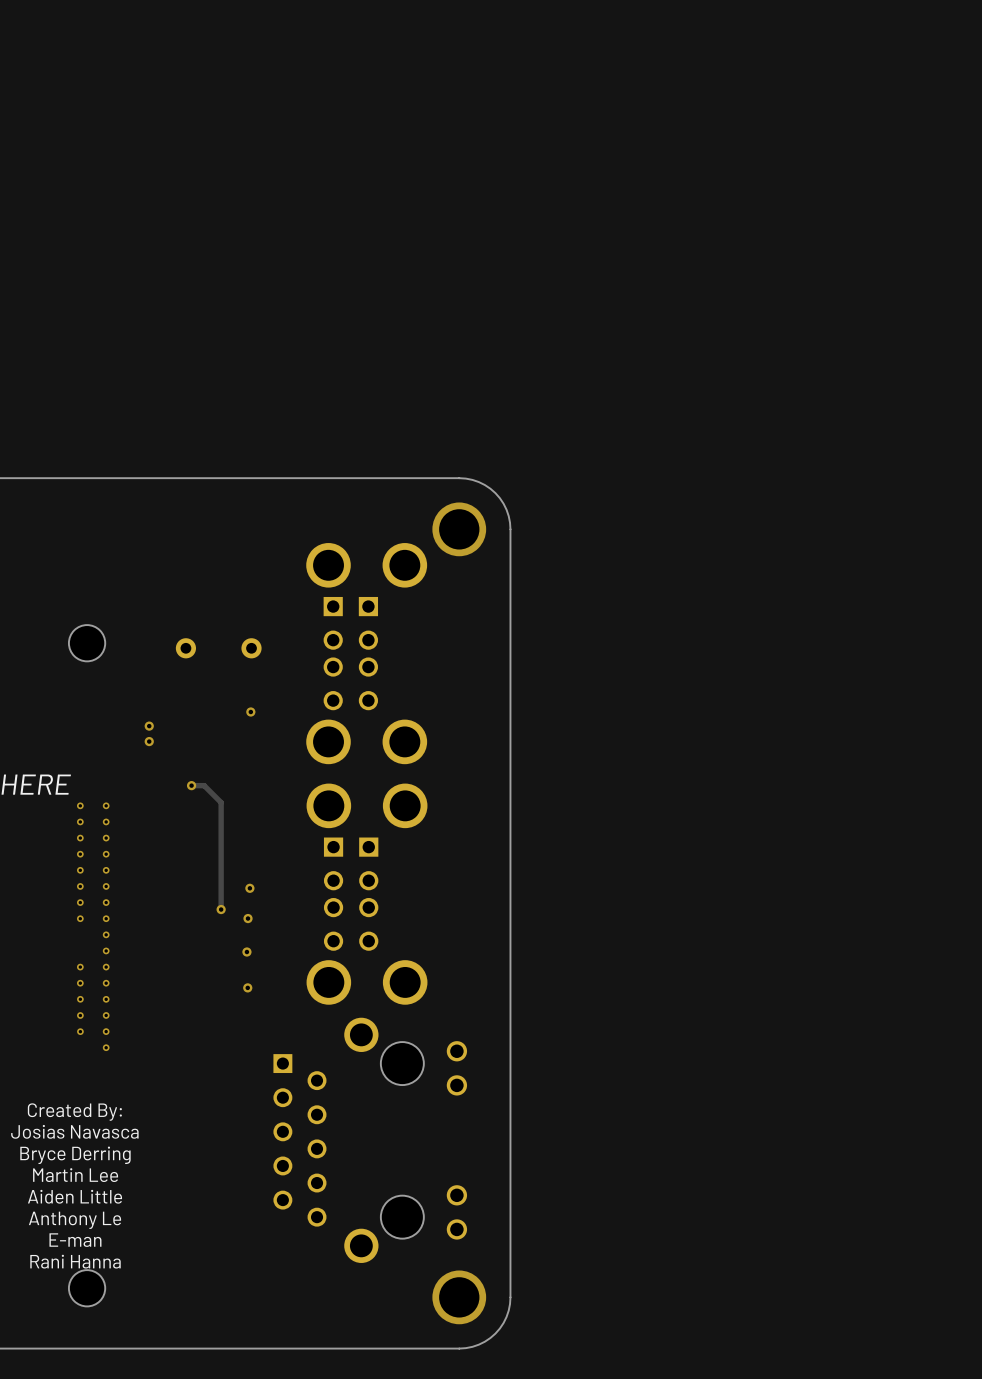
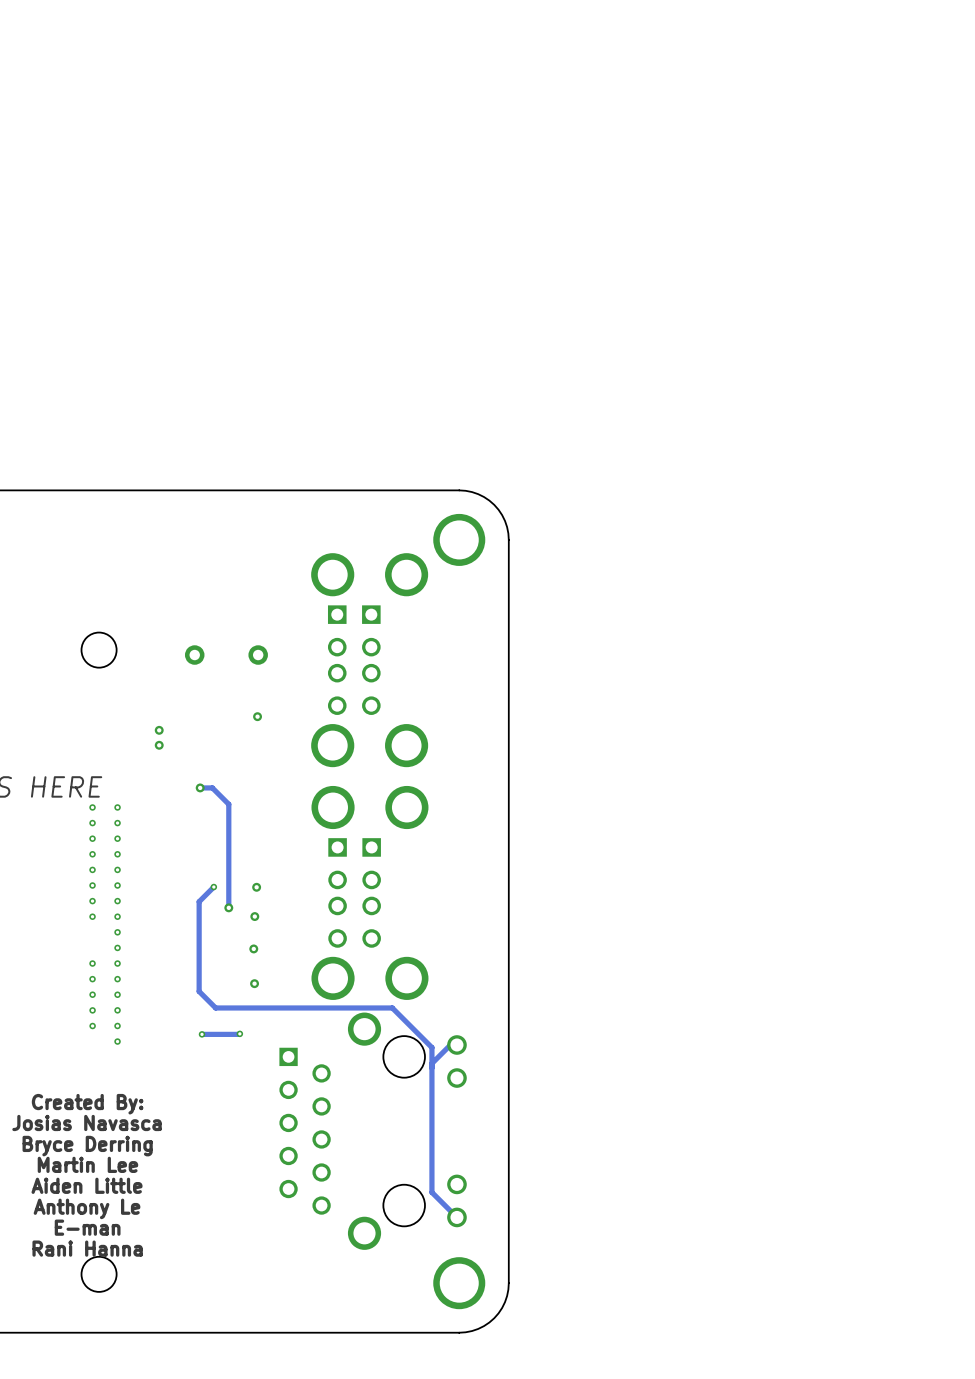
track: none -> (213, 887) (199, 901) (199, 991) (215, 1007) (392, 1007) (431, 1047) (431, 1192) (456, 1217)
via: none -> (213, 887)
track: none -> (239, 1033) (202, 1034)
via: none -> (239, 1033)
via: none -> (202, 1034)
track: none -> (456, 1044) (450, 1044) (431, 1063)

